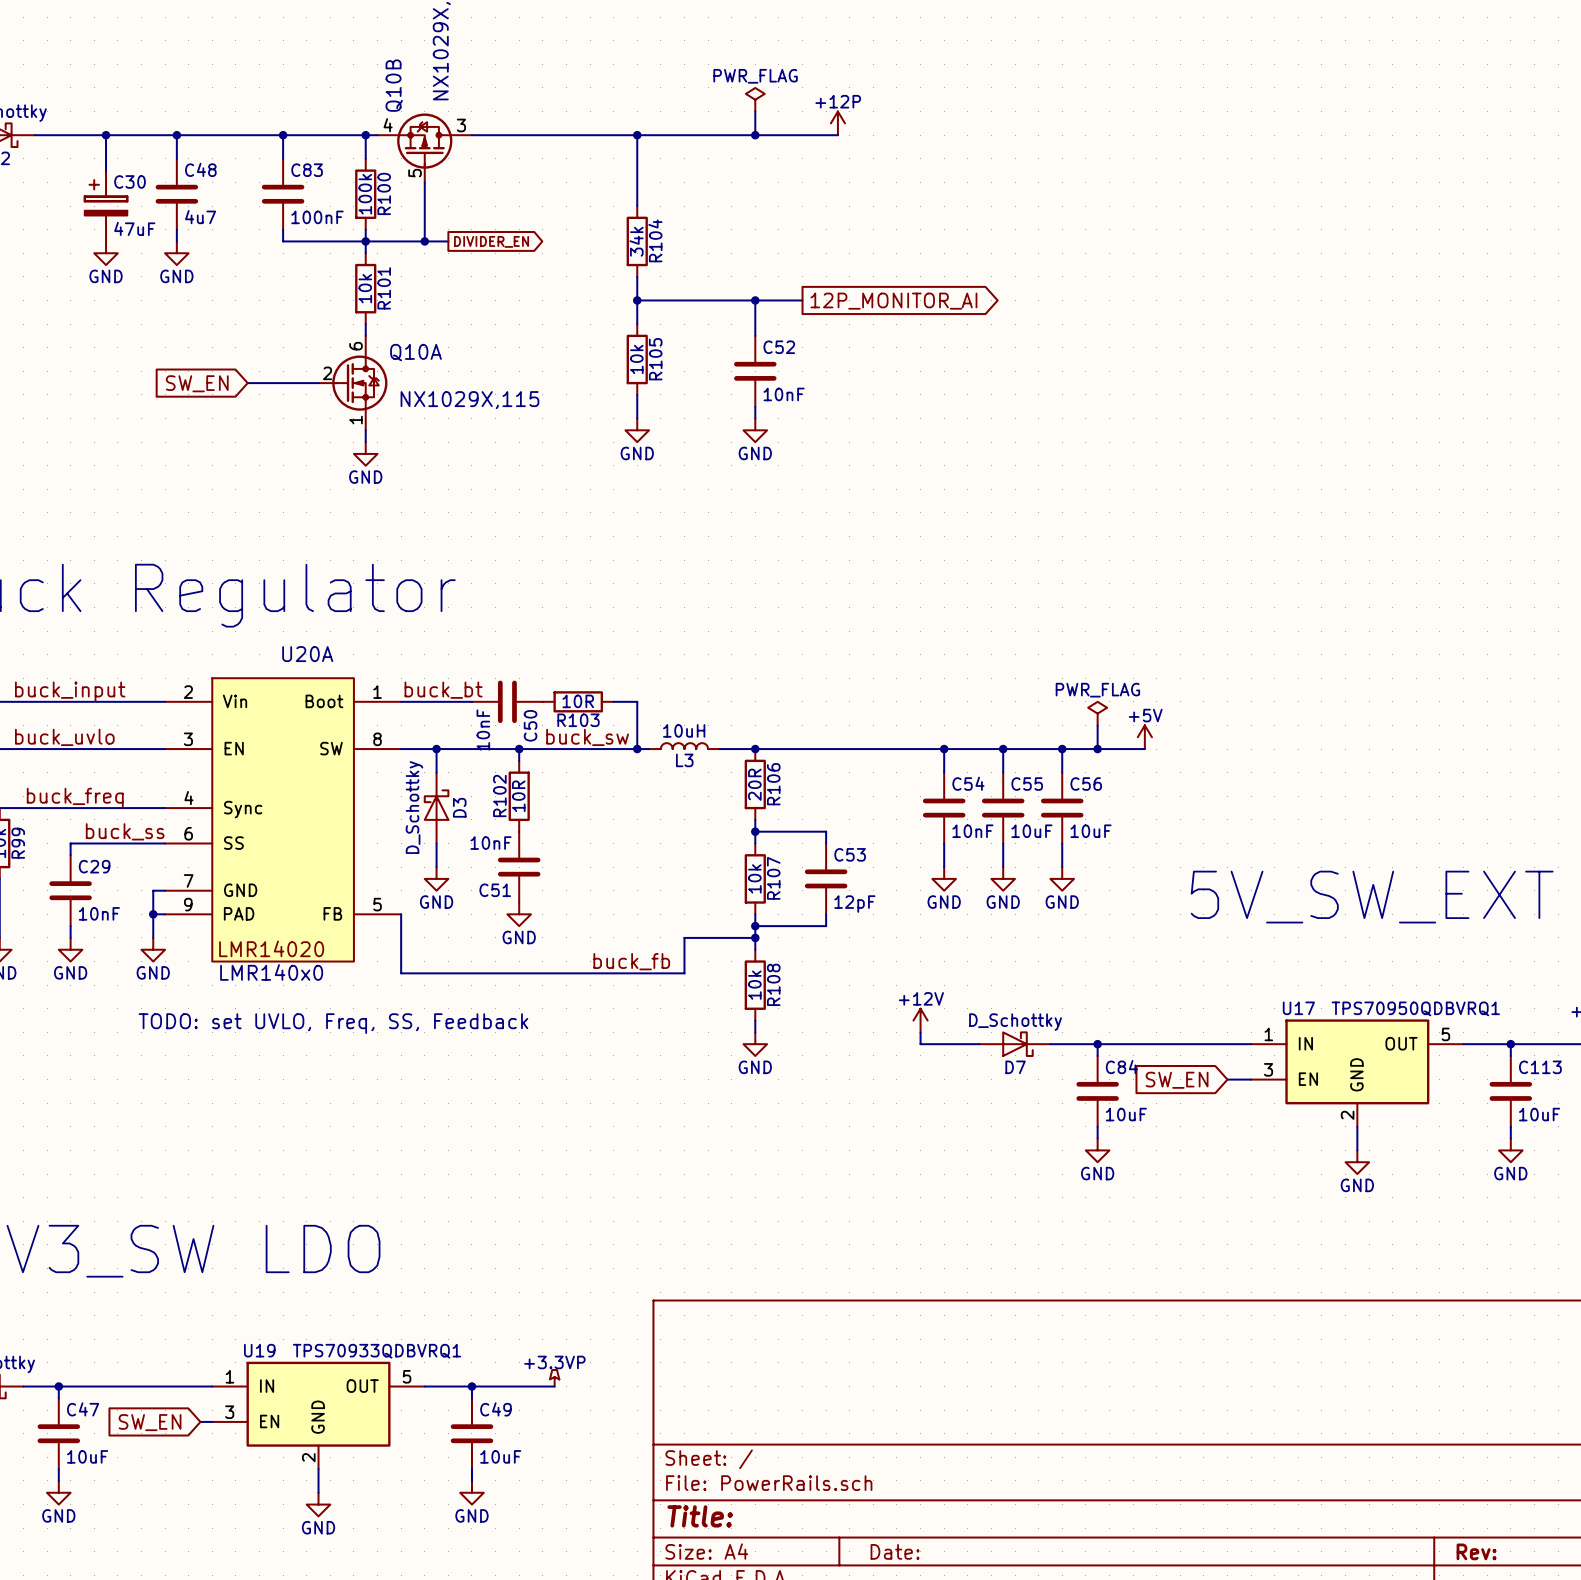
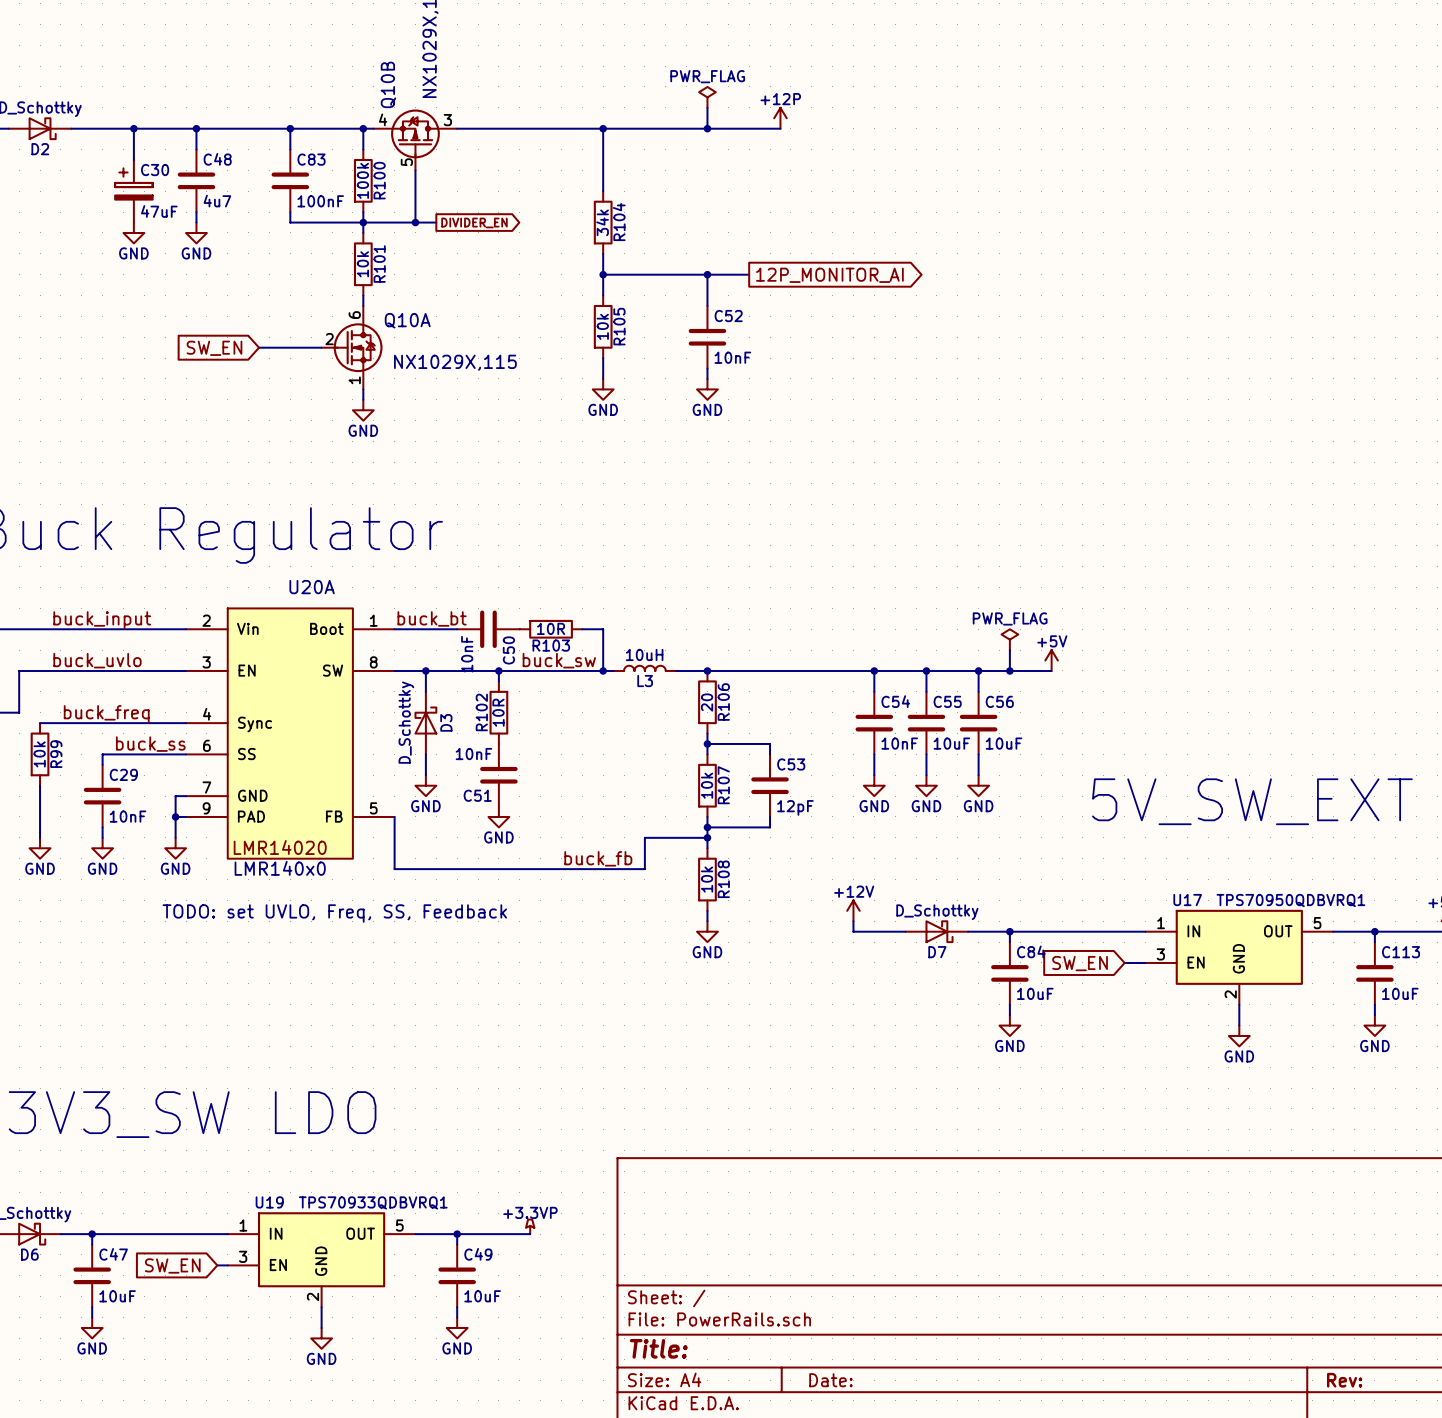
R106 value: 20R (754, 784) -> 20 (707, 702)

